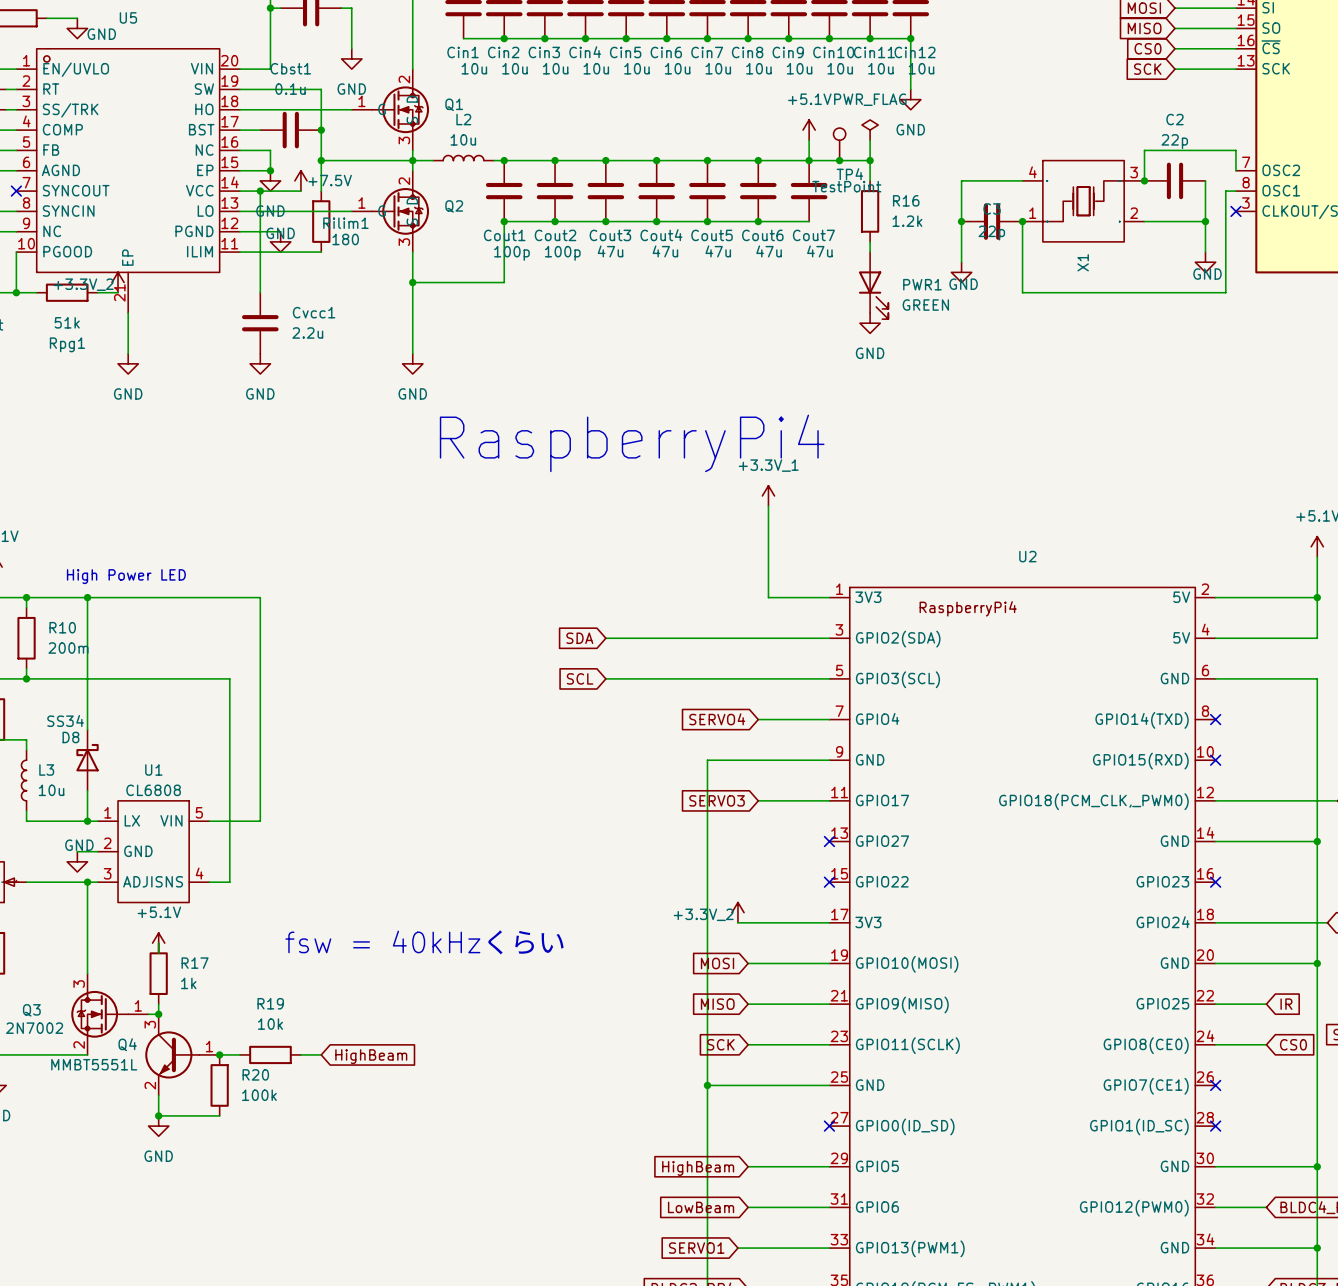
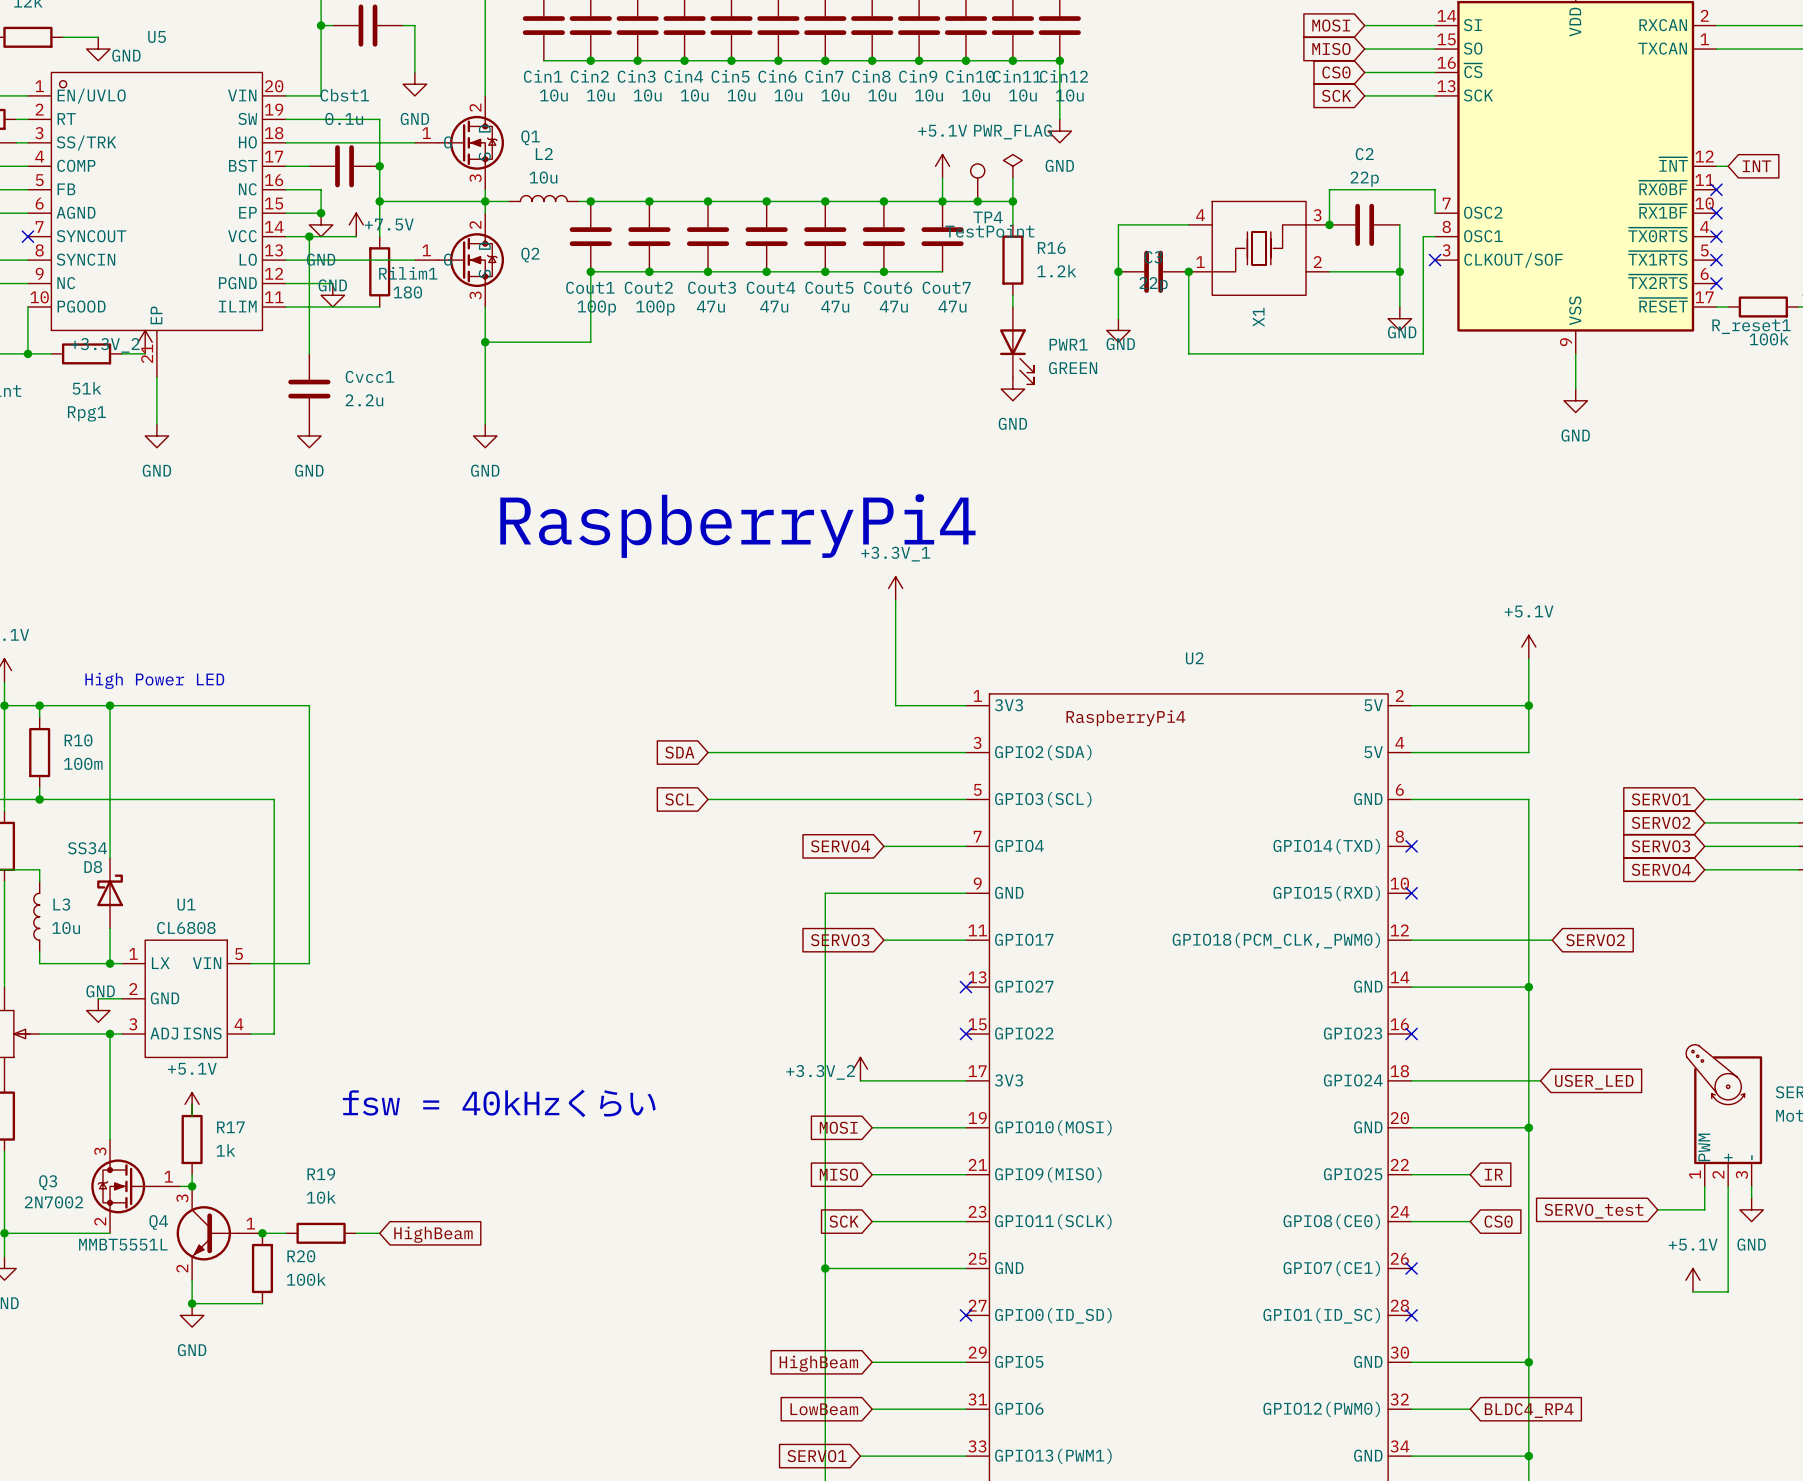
R10 value: 200m (68, 648) -> 100m (83, 763)

